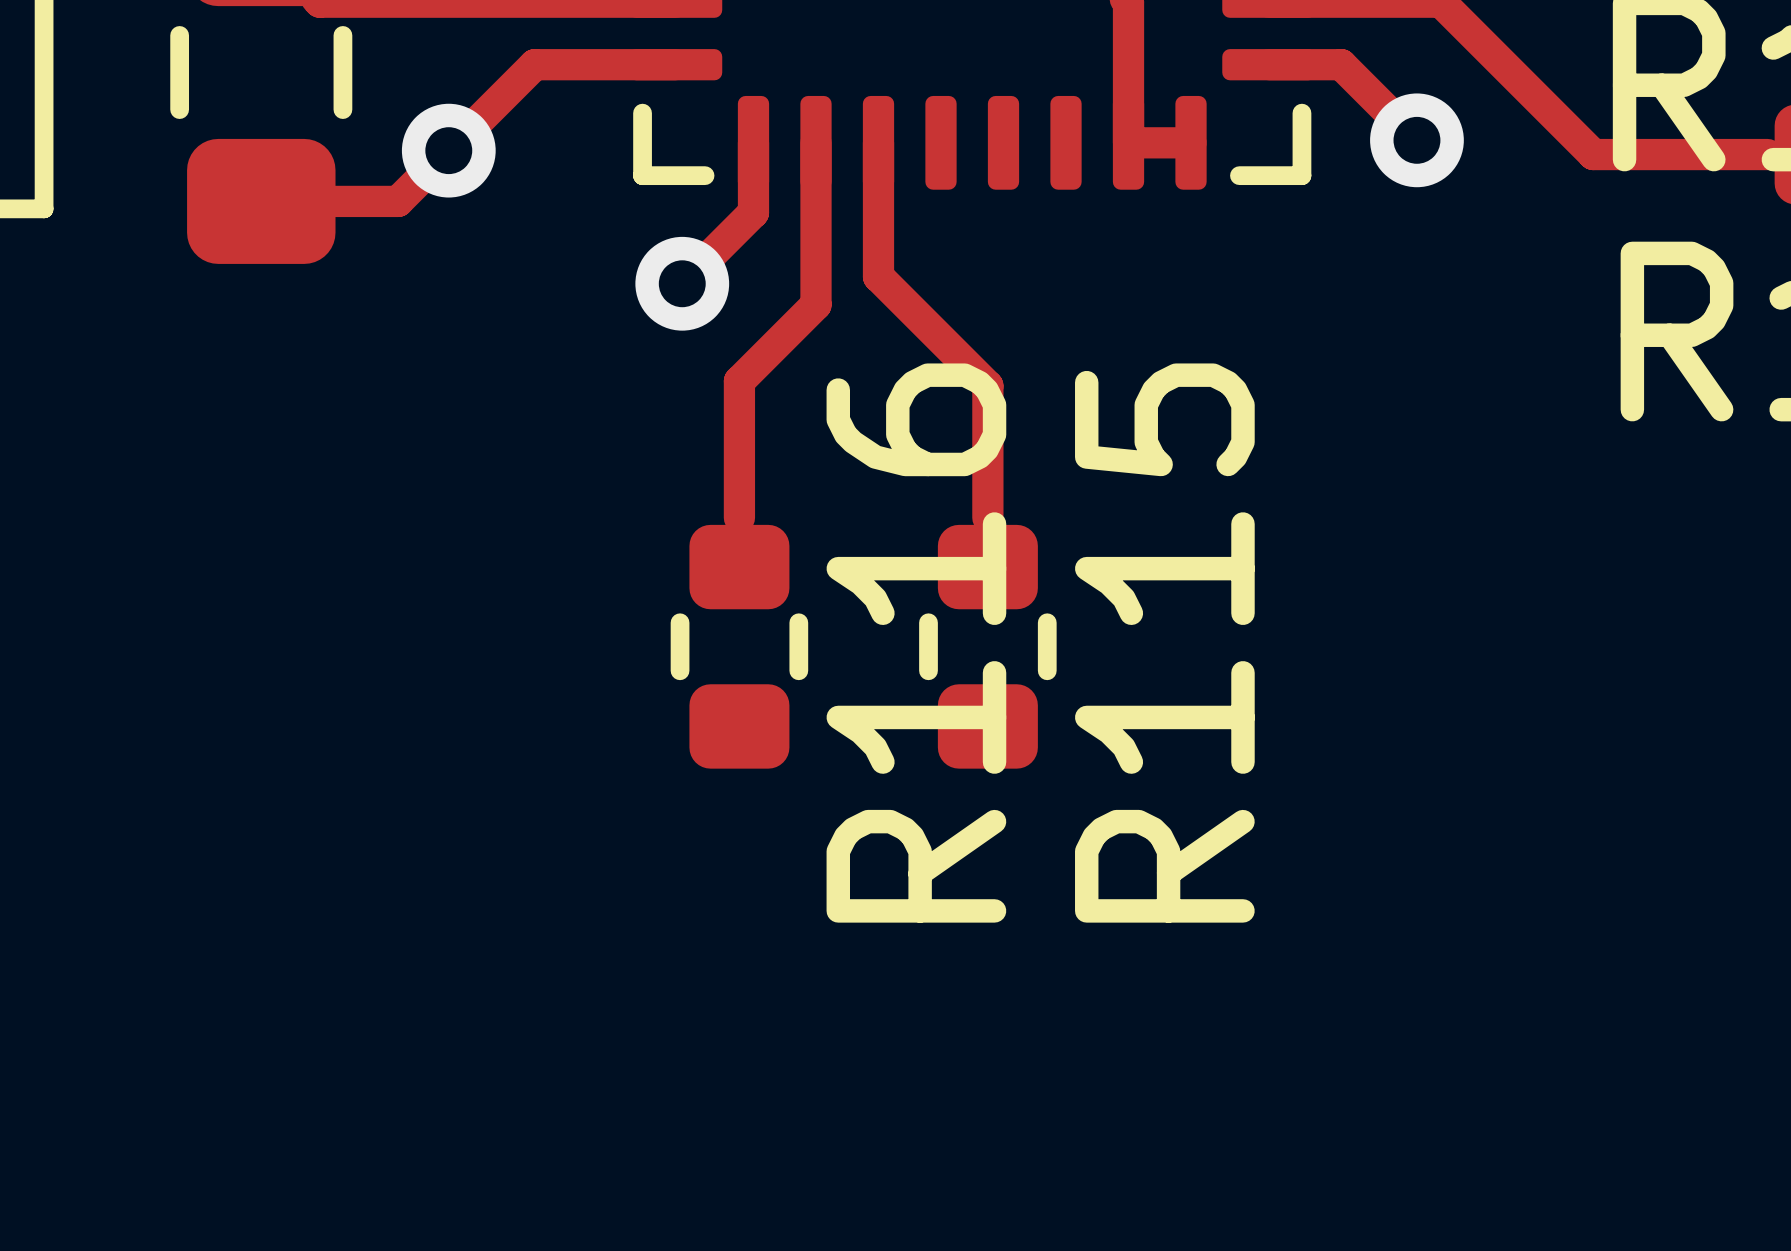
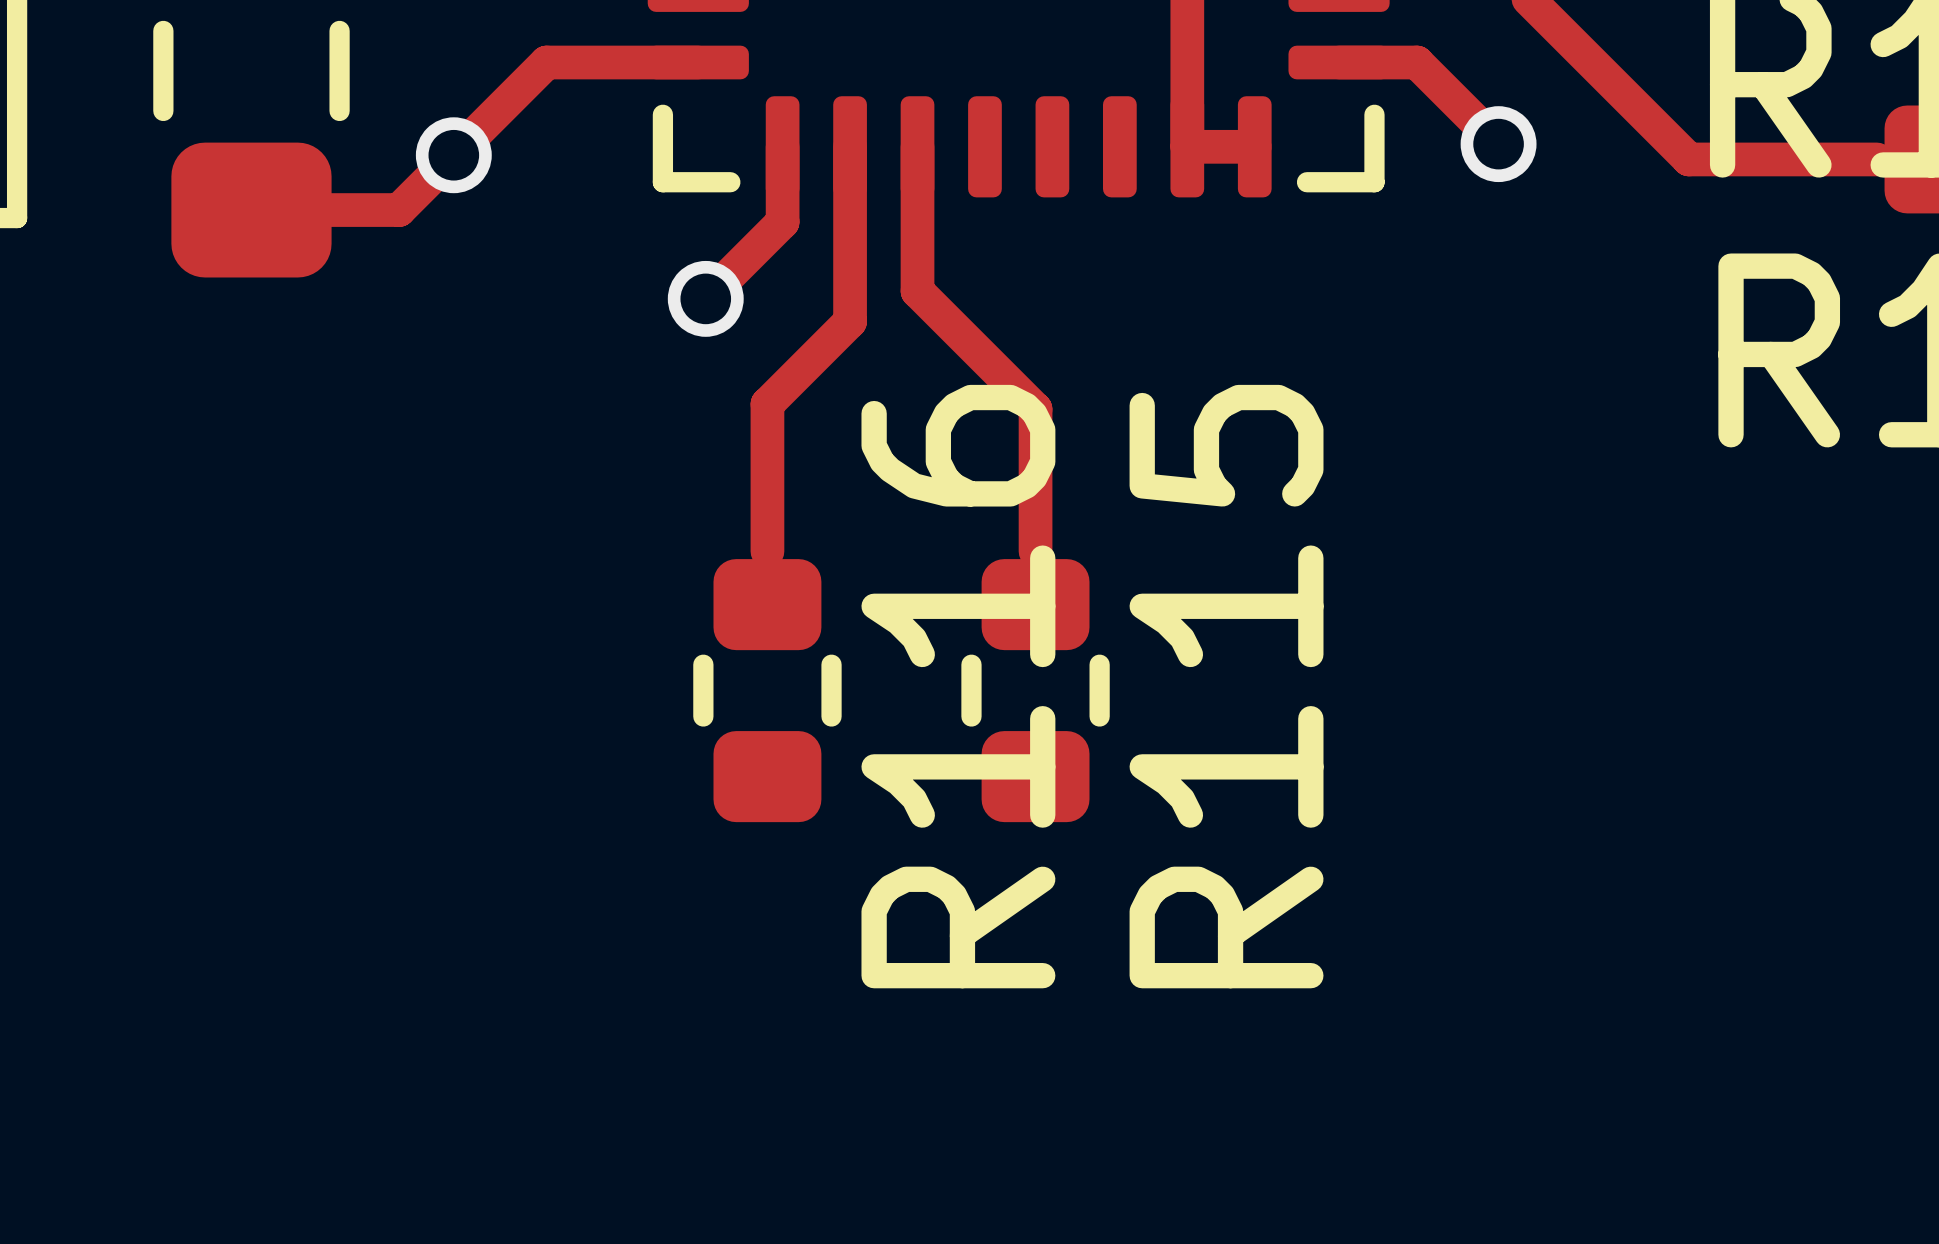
via size: [1370, 93, 1464, 188] -> [1460, 106, 1537, 183]
via size: [401, 103, 496, 198] -> [415, 117, 492, 194]
via size: [635, 236, 730, 331] -> [667, 260, 744, 337]

